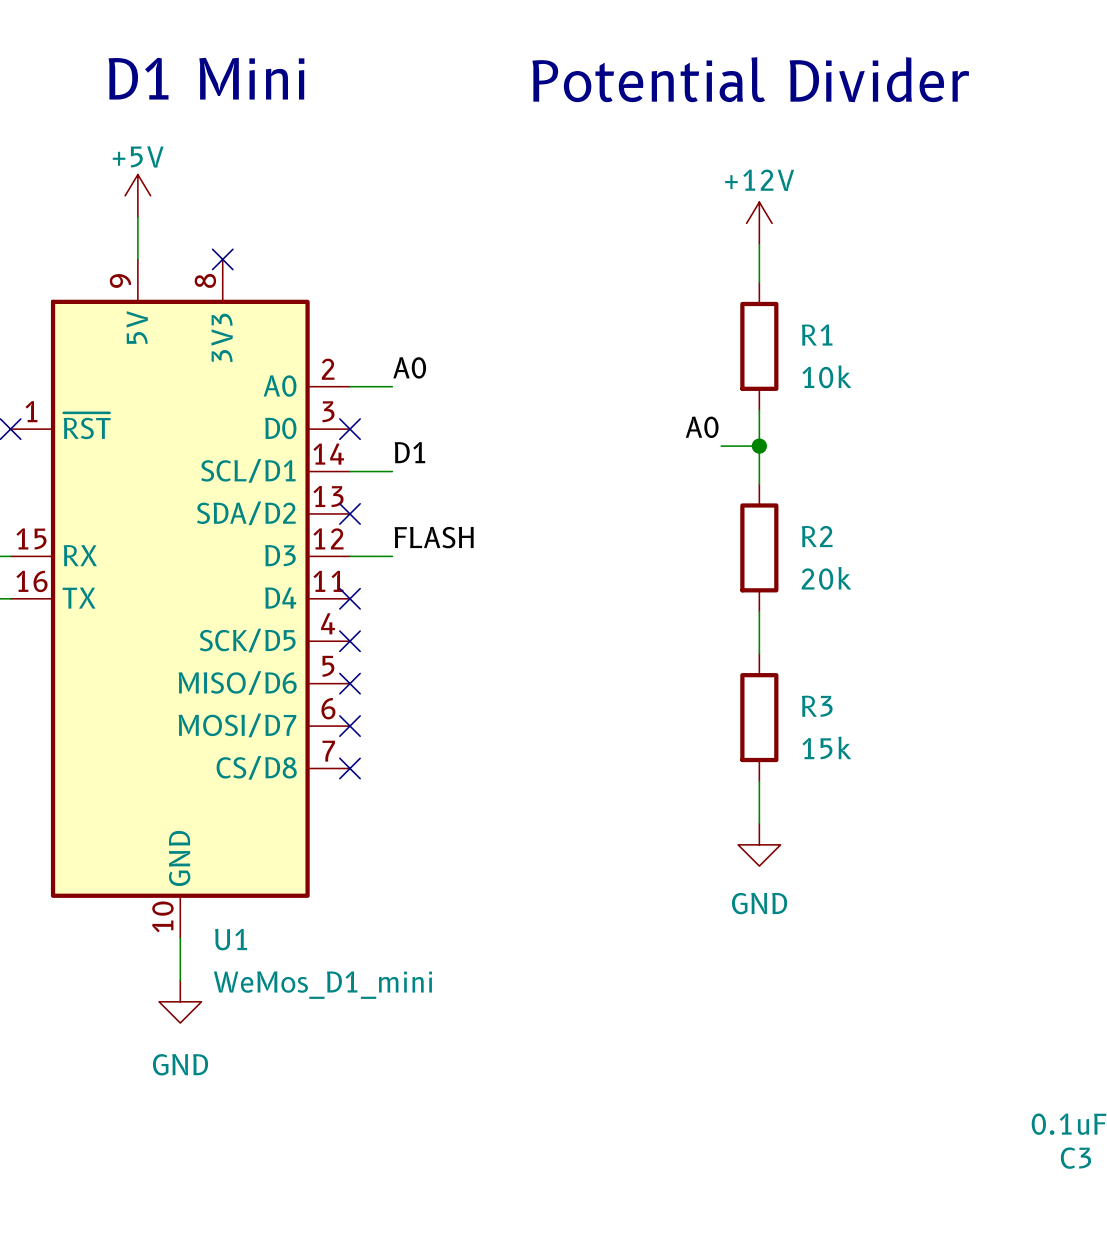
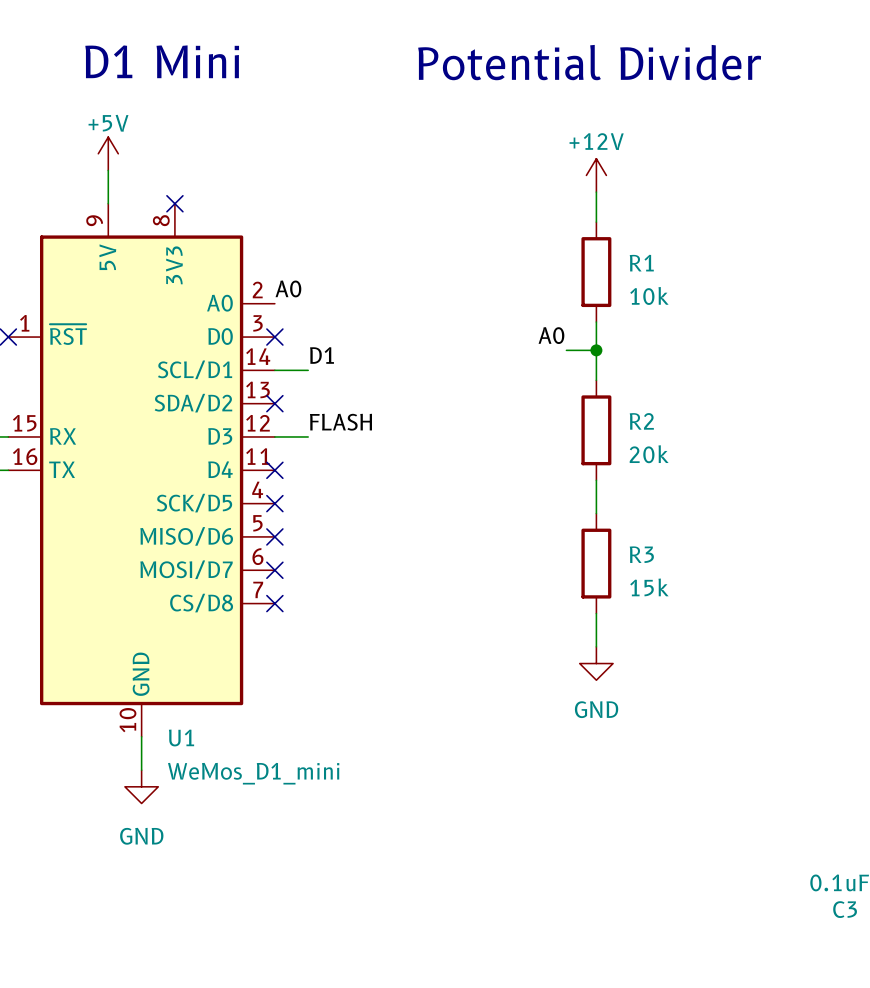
label position: A0 (409, 367) -> A0 (288, 288)
wire: (349, 386) (392, 386) -> none

